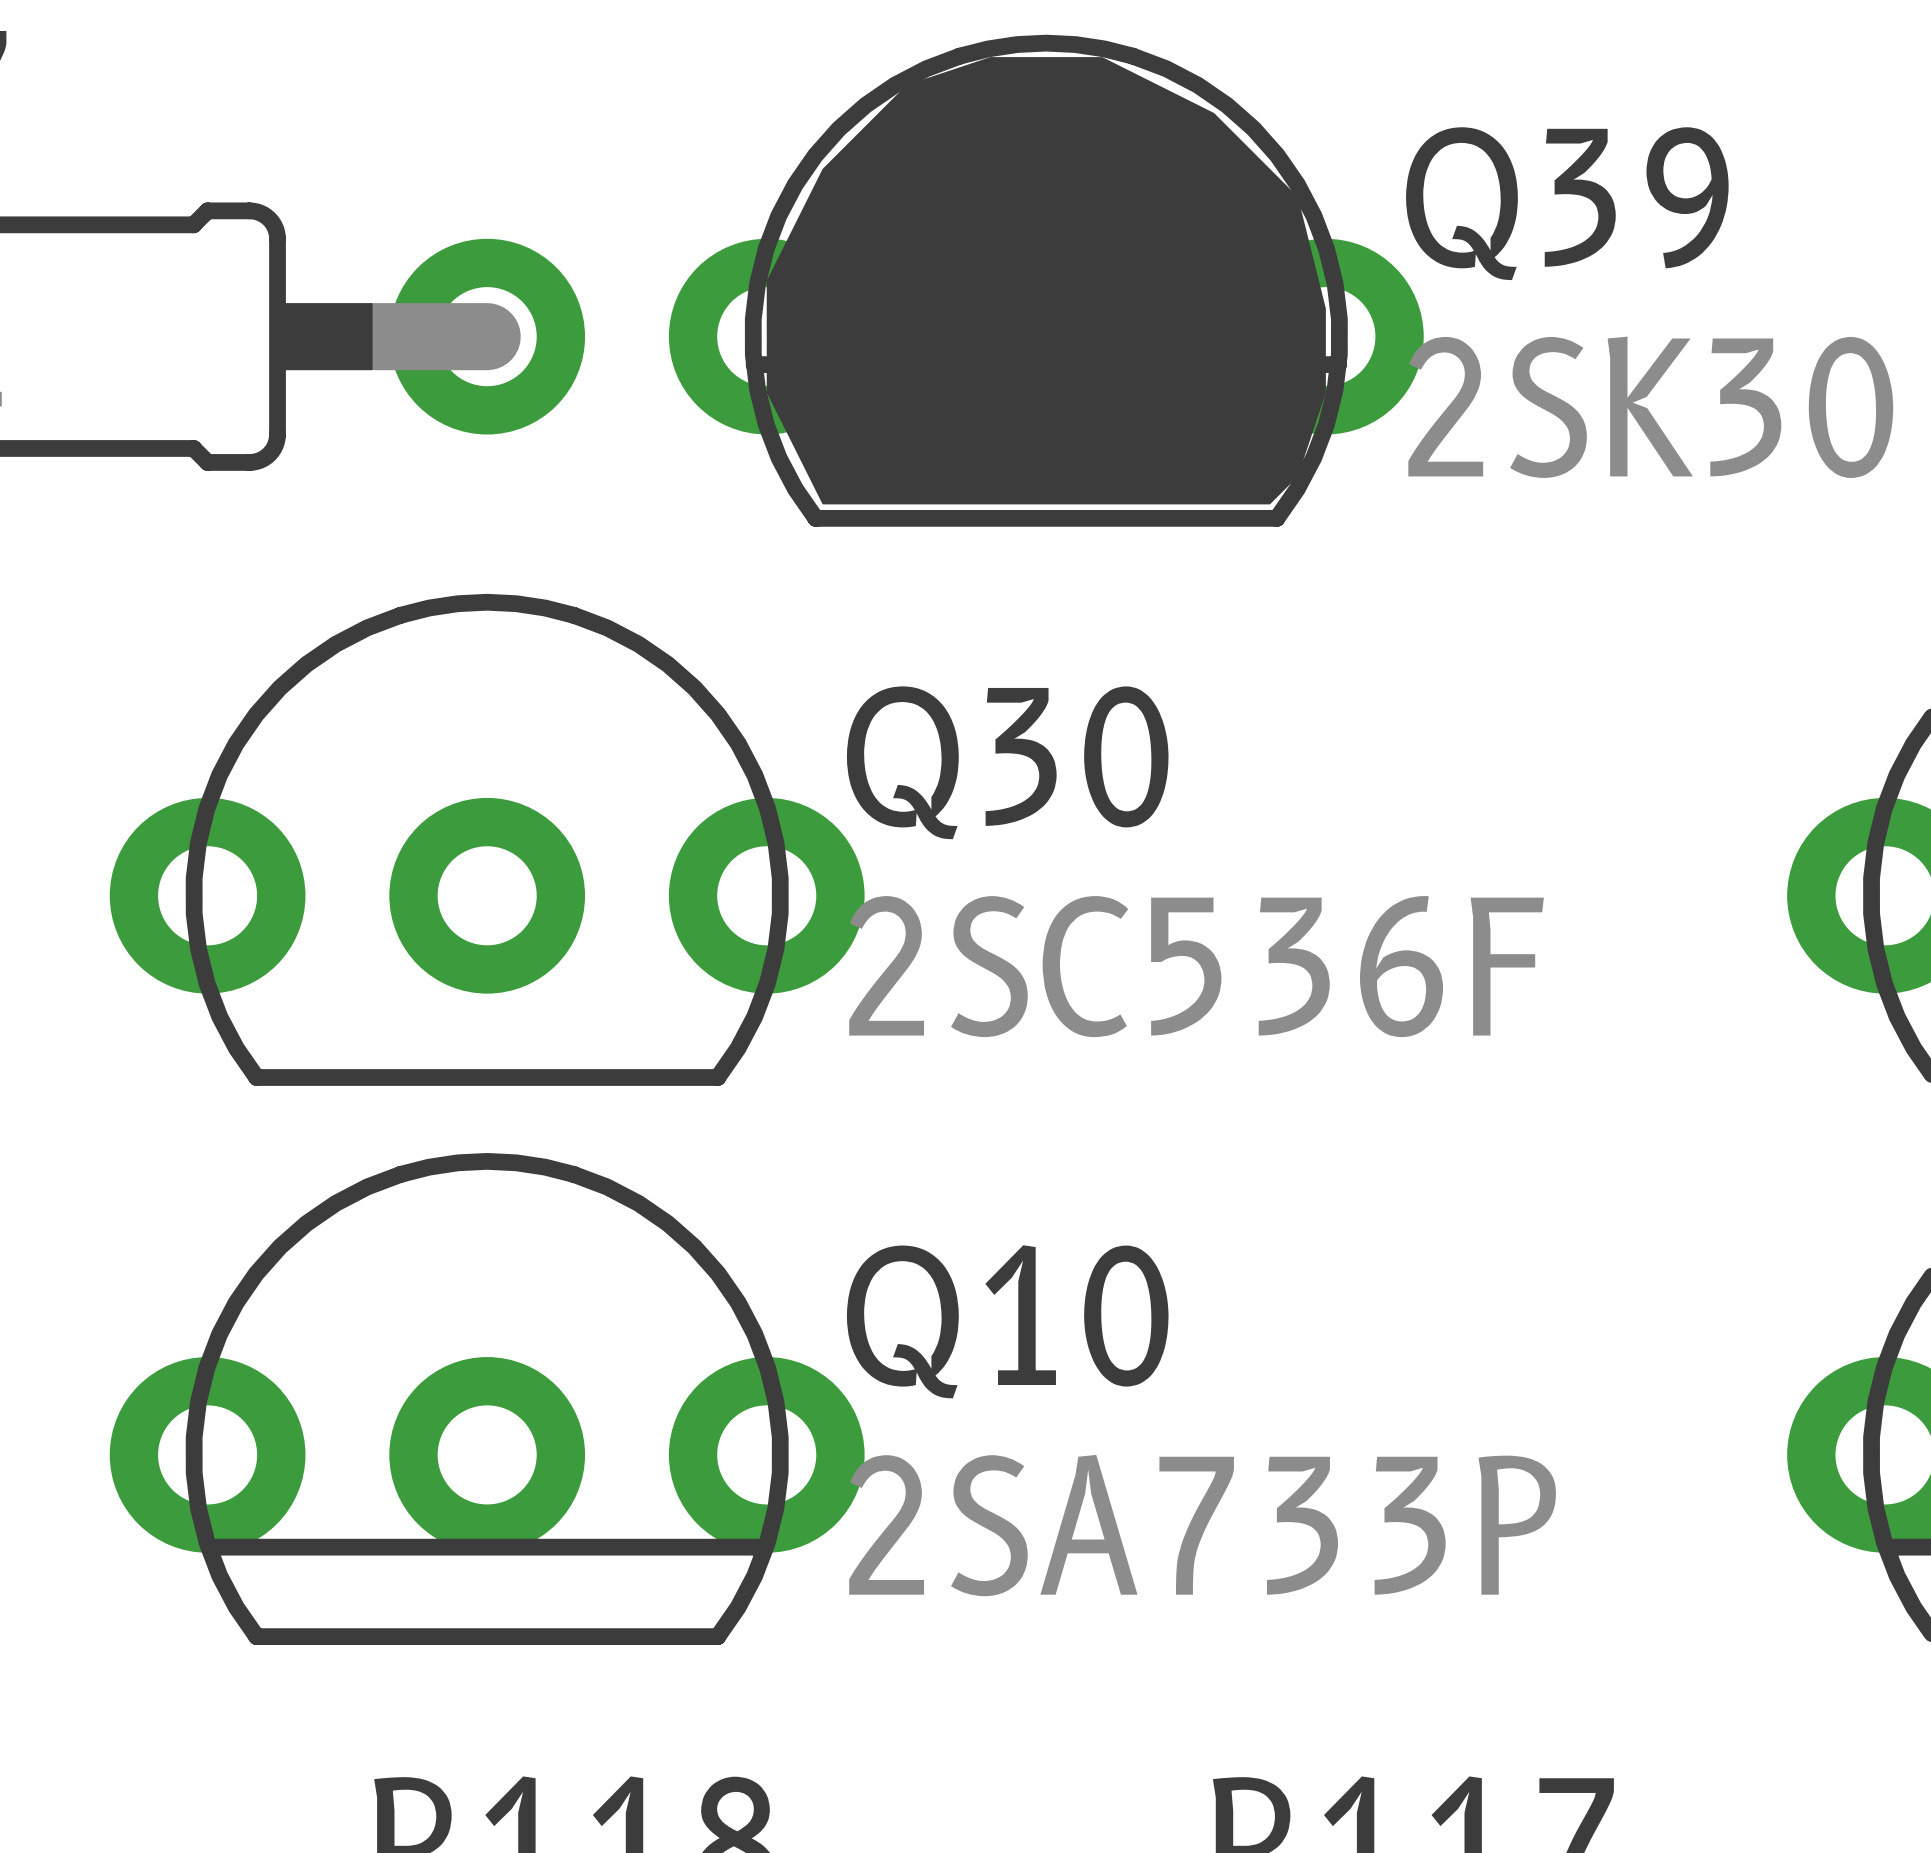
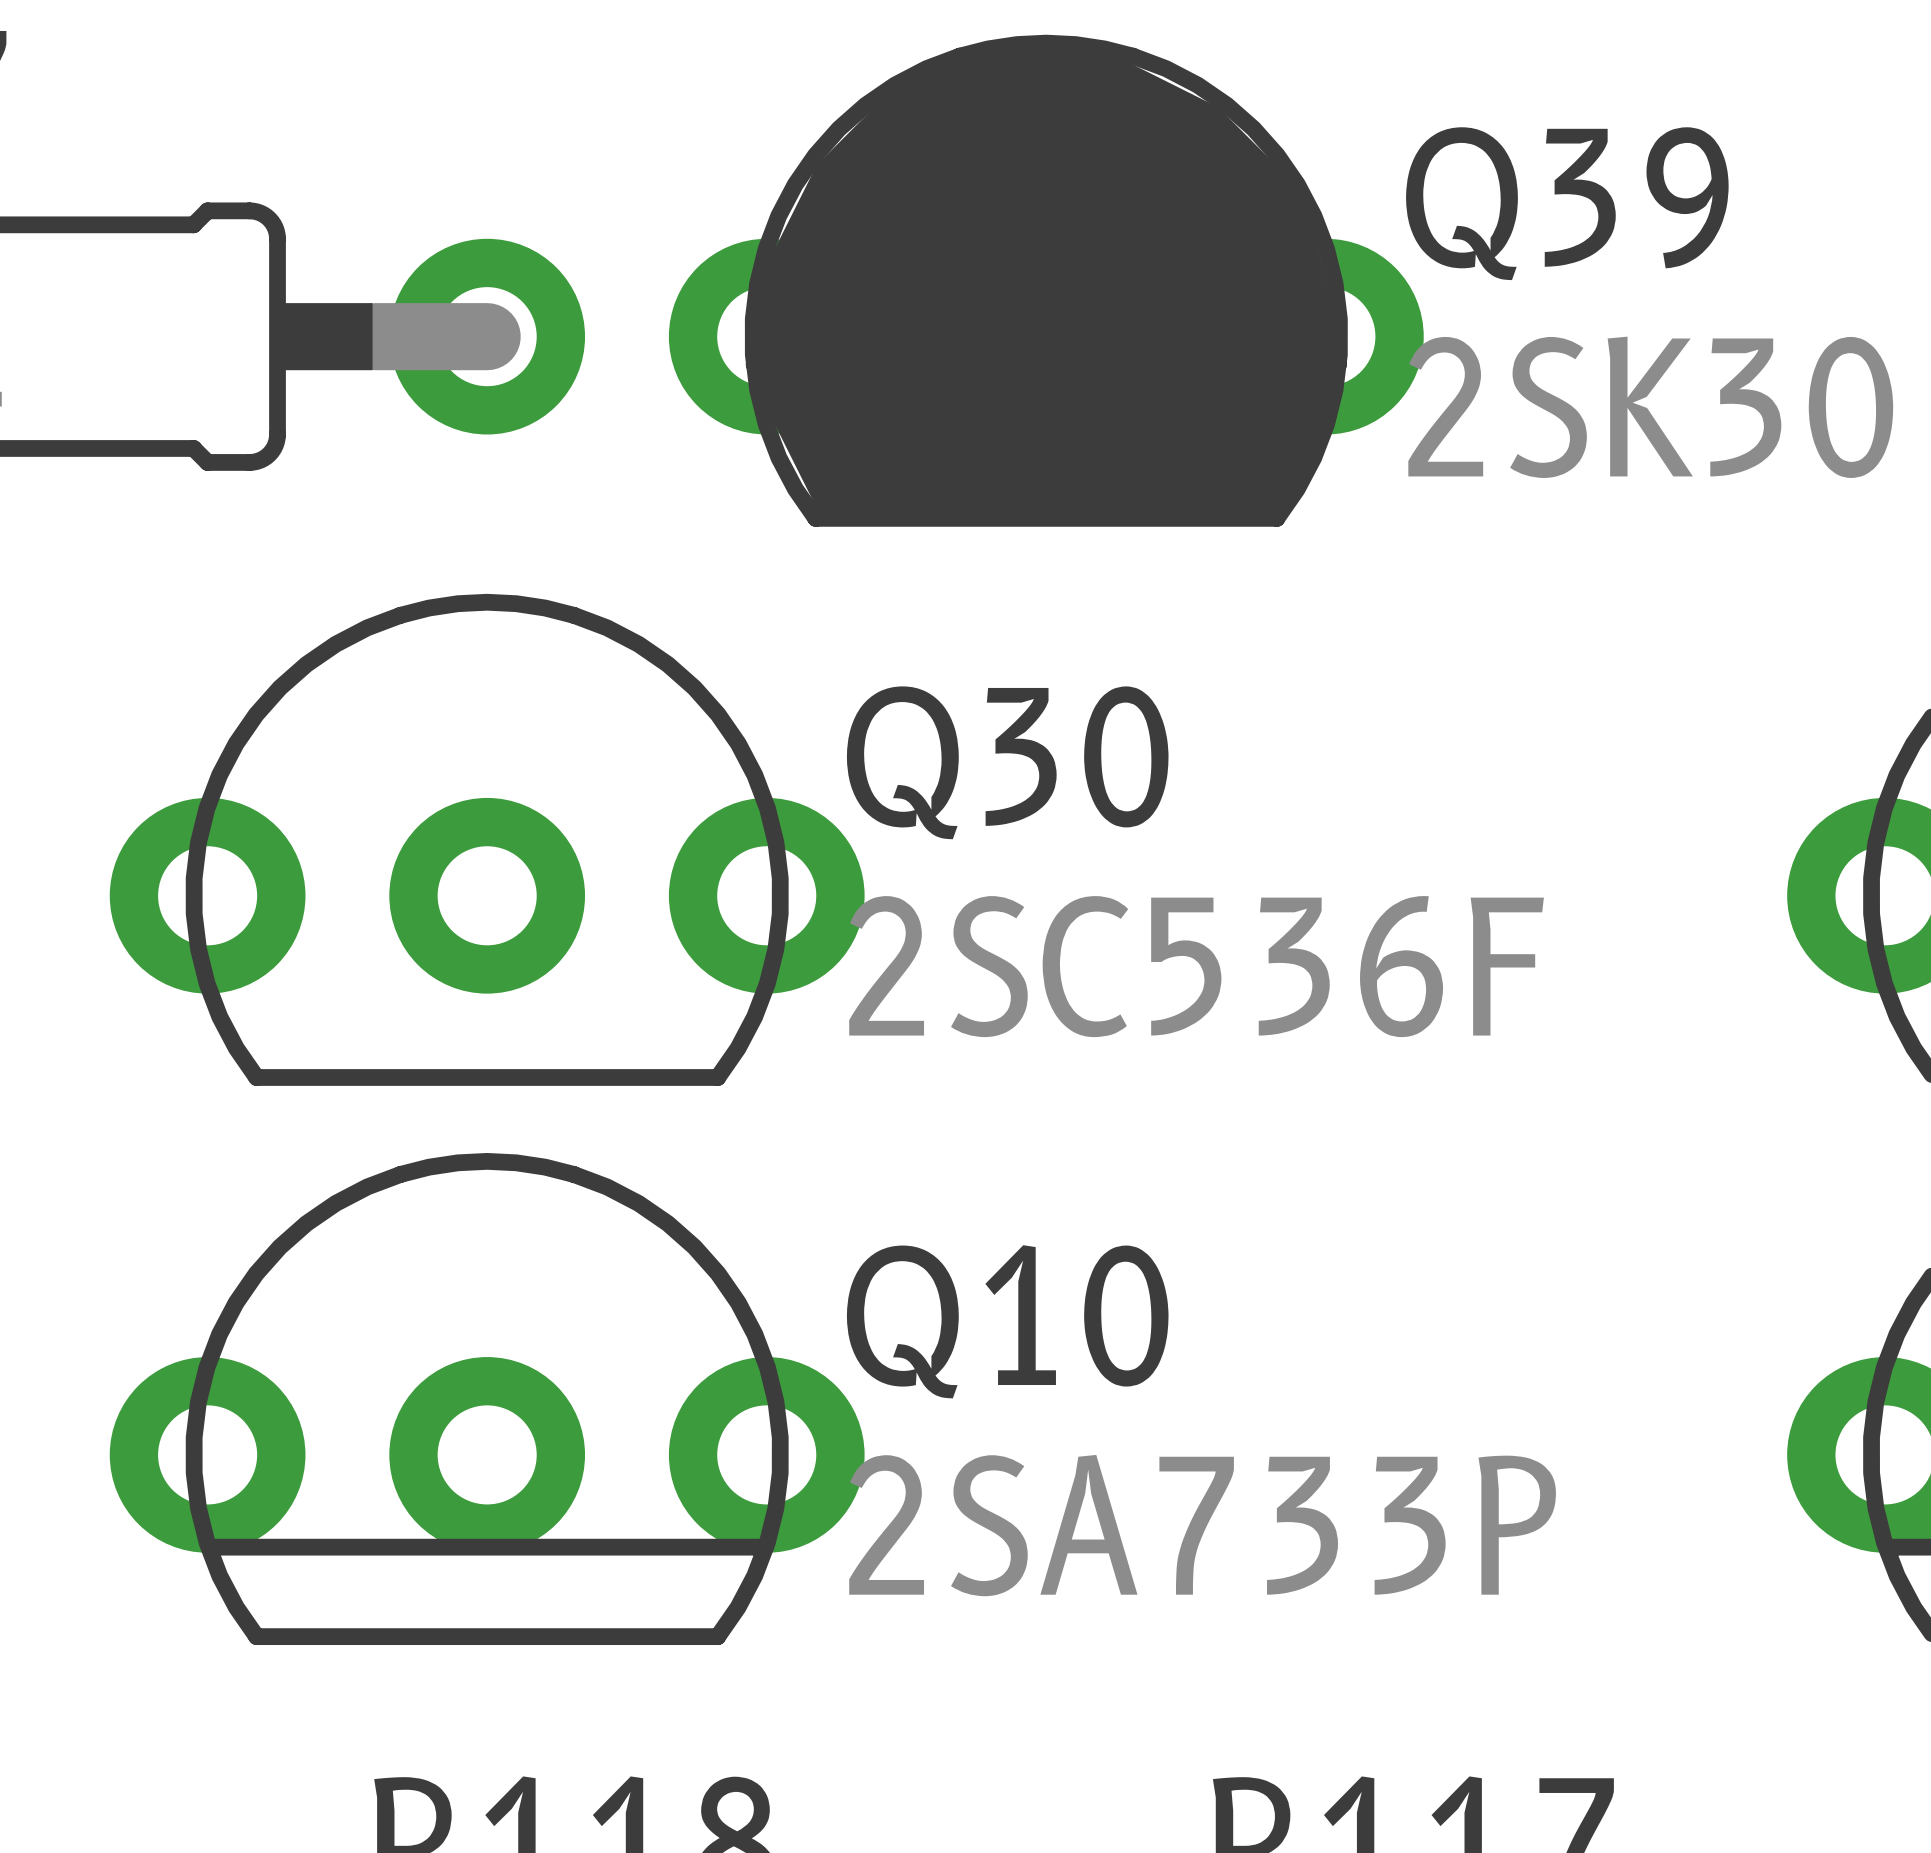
Q39 footprint: [668, 34, 1424, 527] -> [668, 34, 1424, 527]

